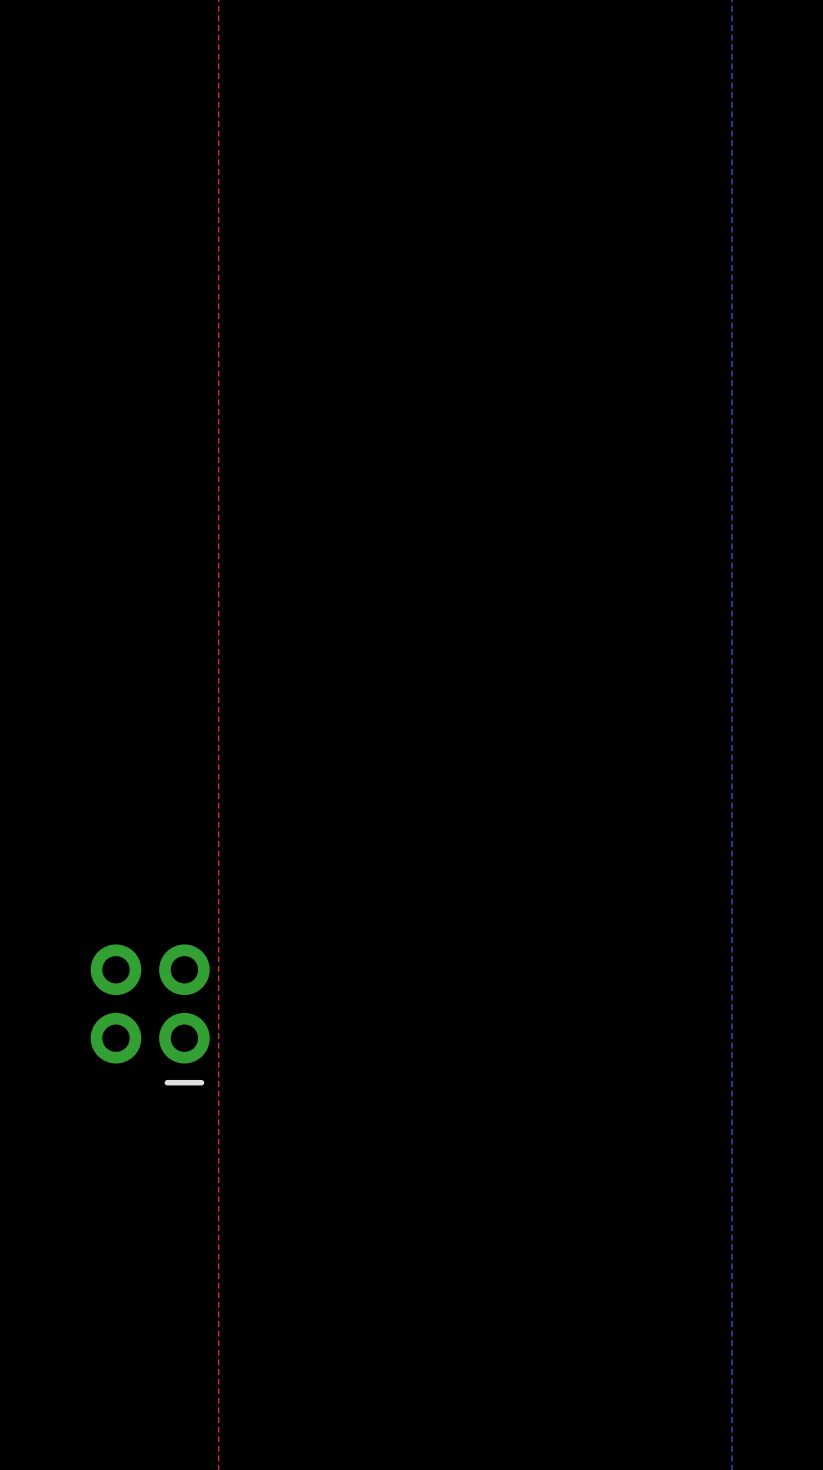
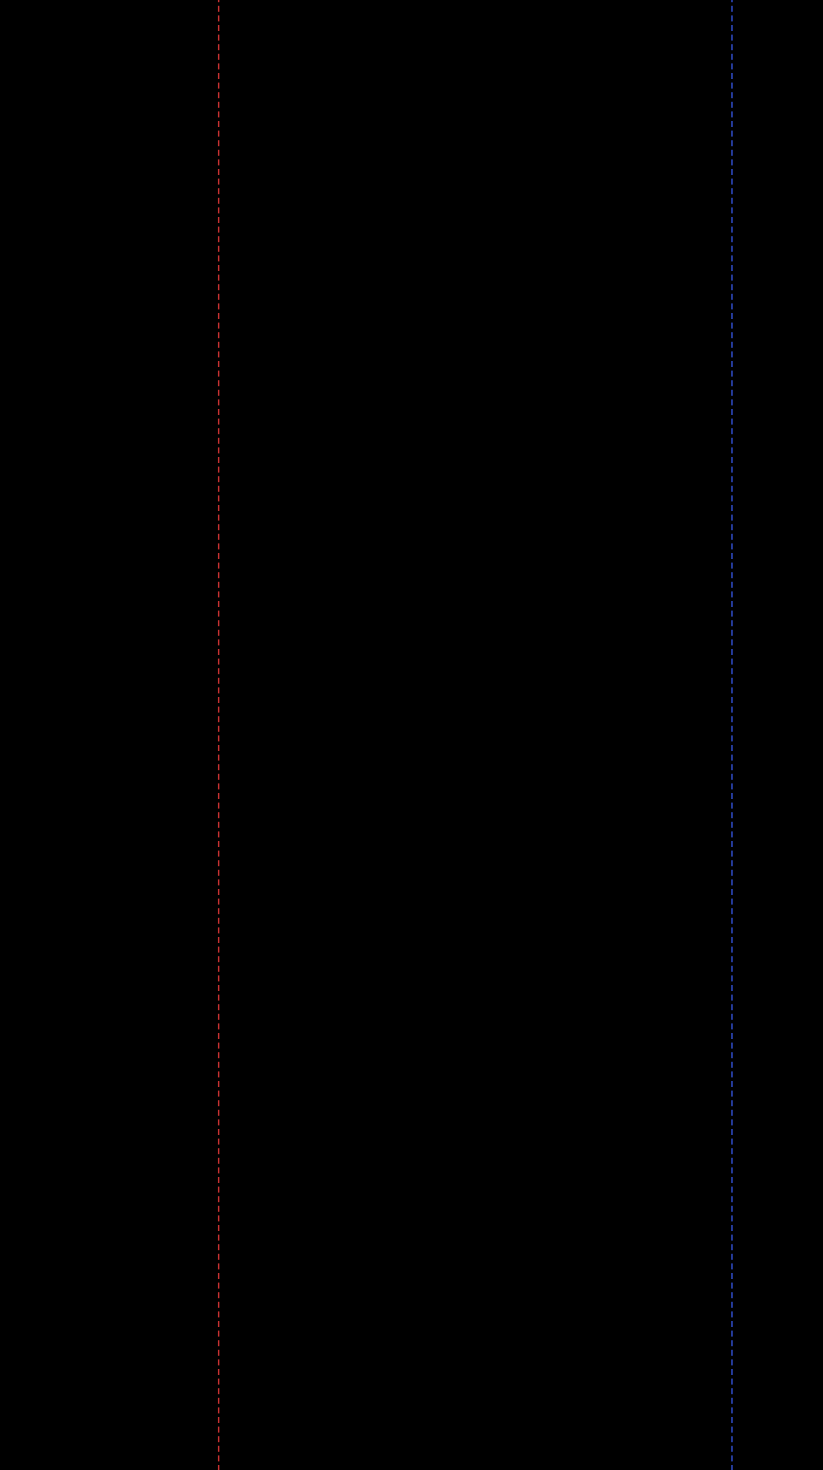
part: (150, 1014) -> none

